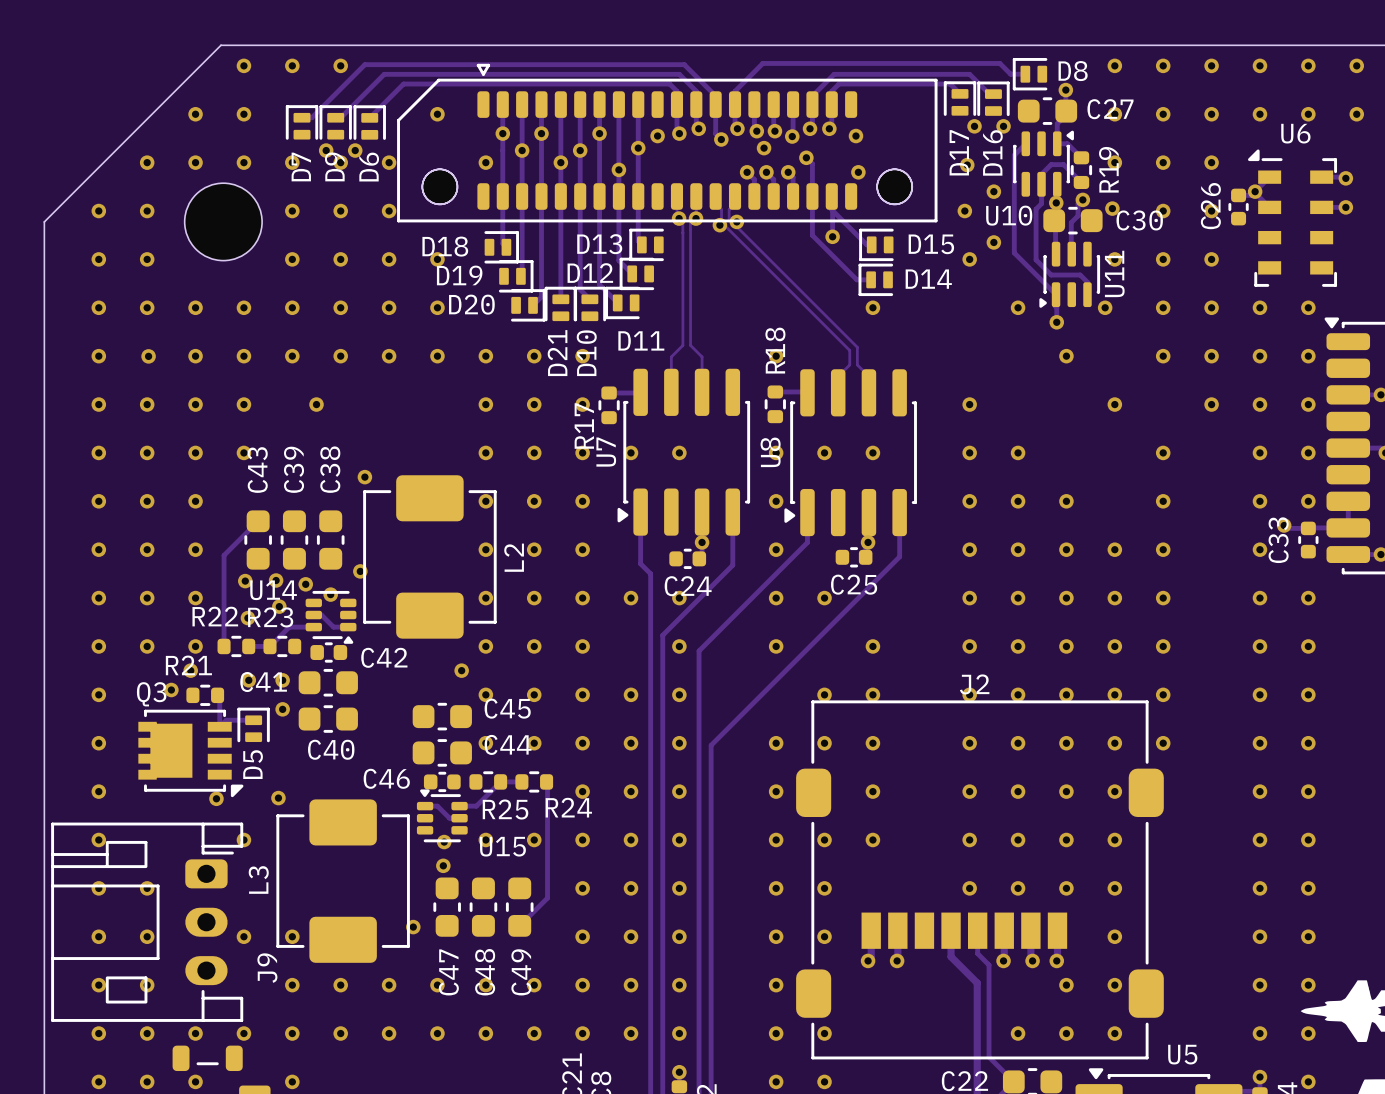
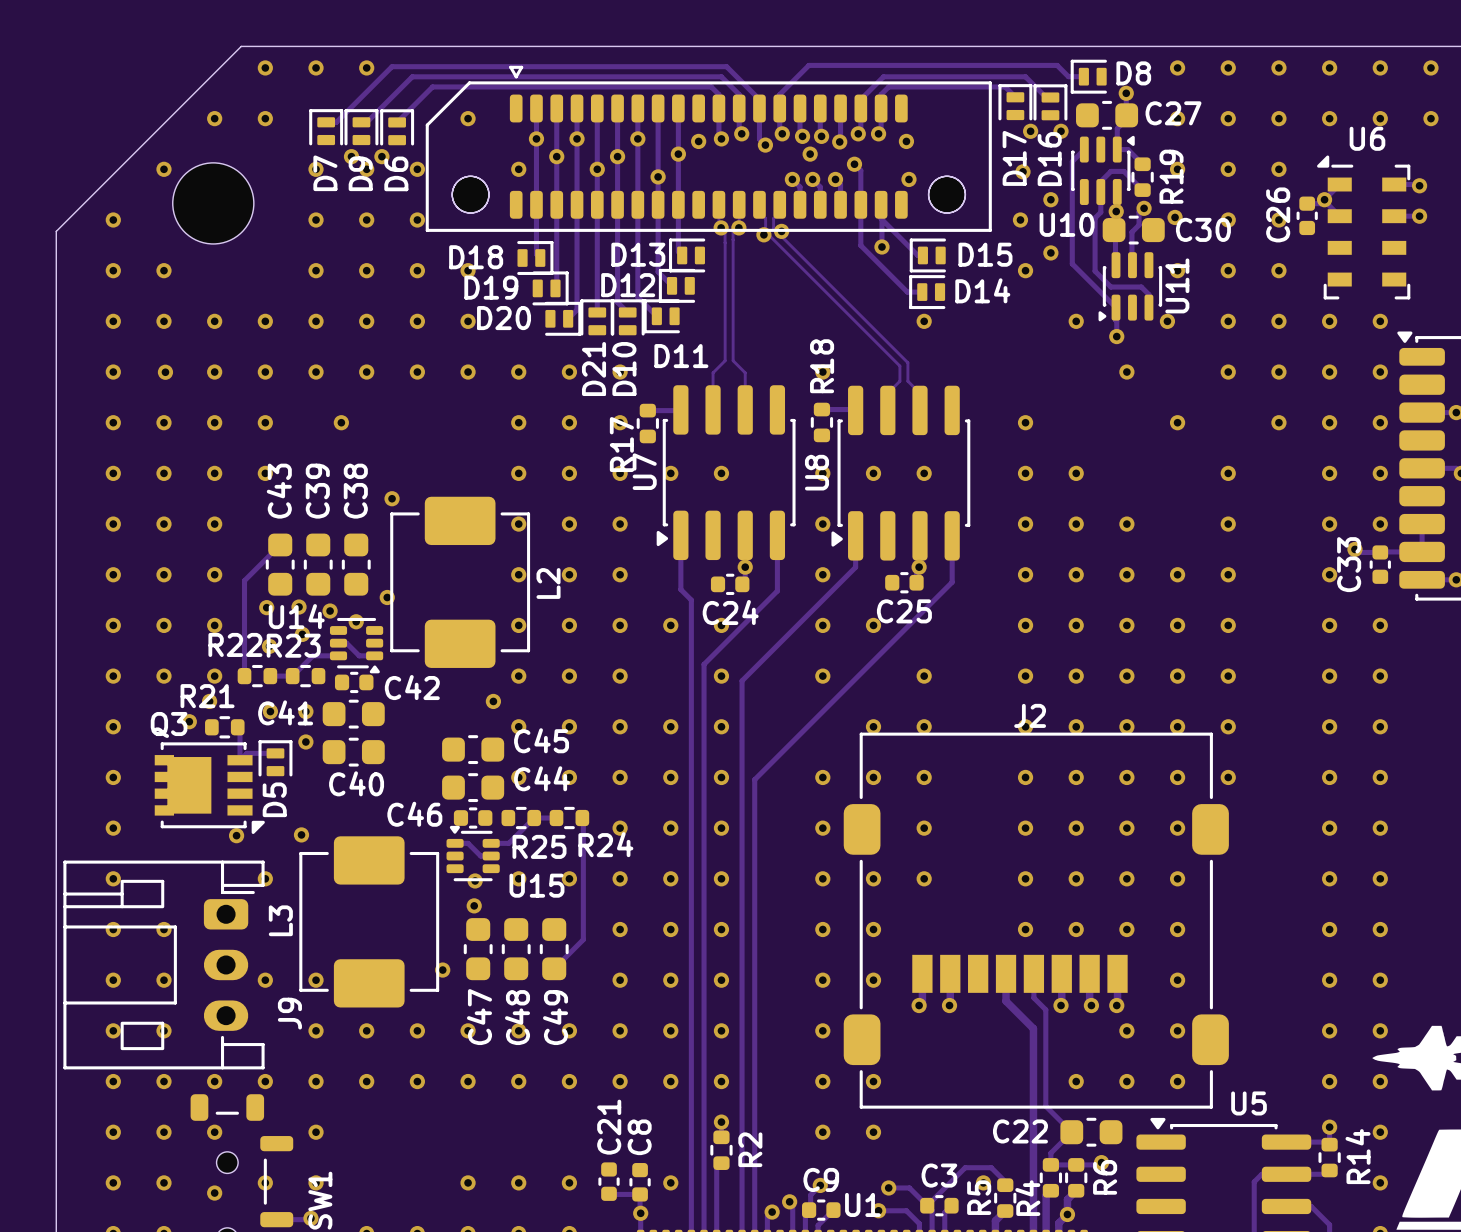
via: (195, 162) -> none
via: (243, 162) -> none
via: (147, 211) -> none
part position: (223, 221) -> (213, 203)

